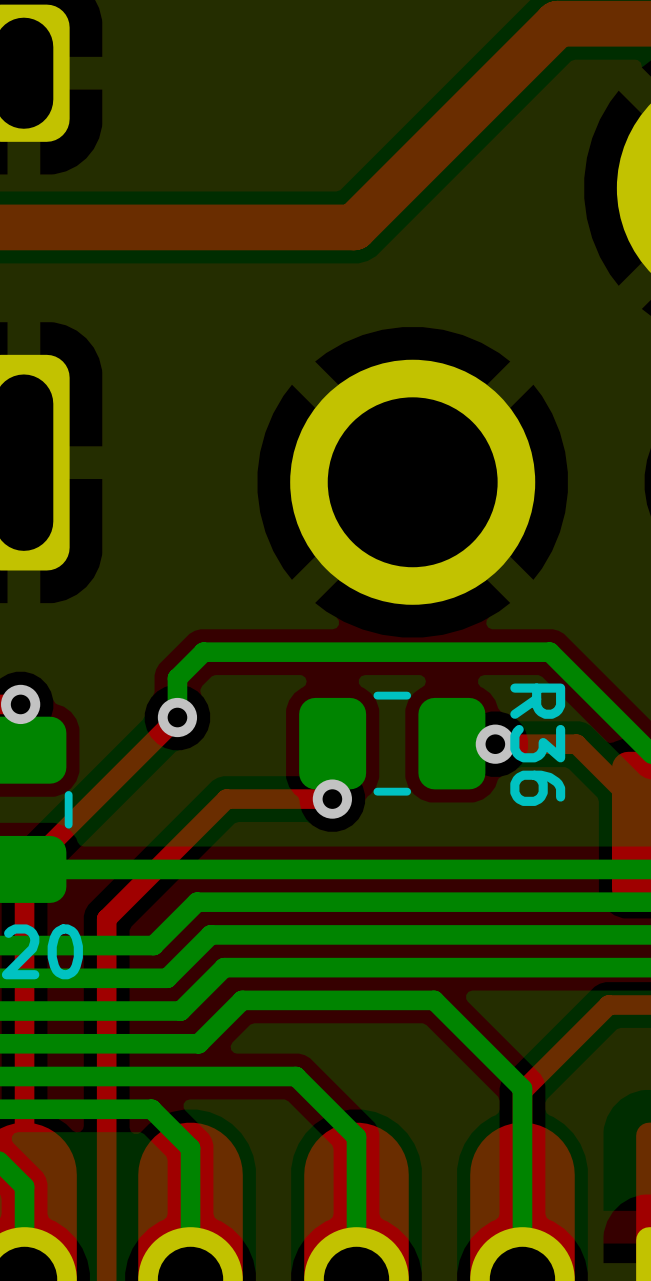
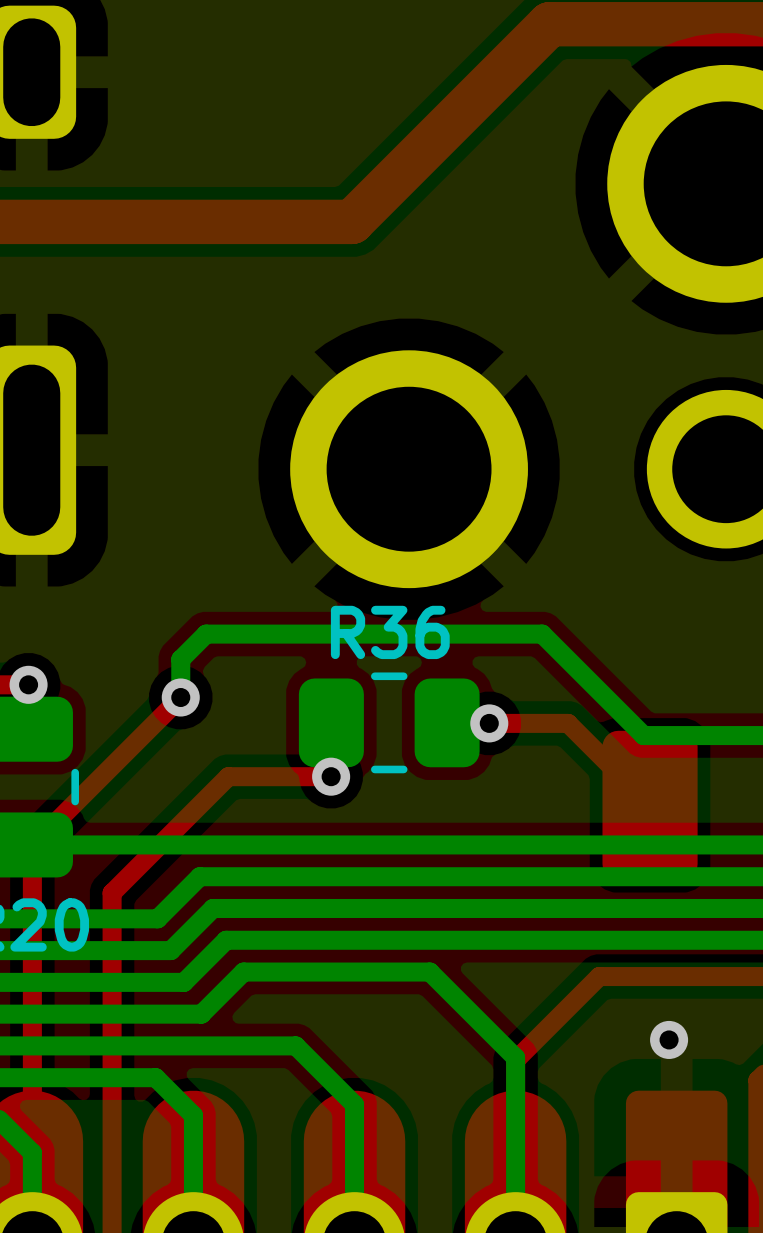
R36 name rotation: 0° (537, 744) -> 90° counterclockwise (390, 632)
R36 name position: R36 (537, 744) -> R36 (390, 632)

